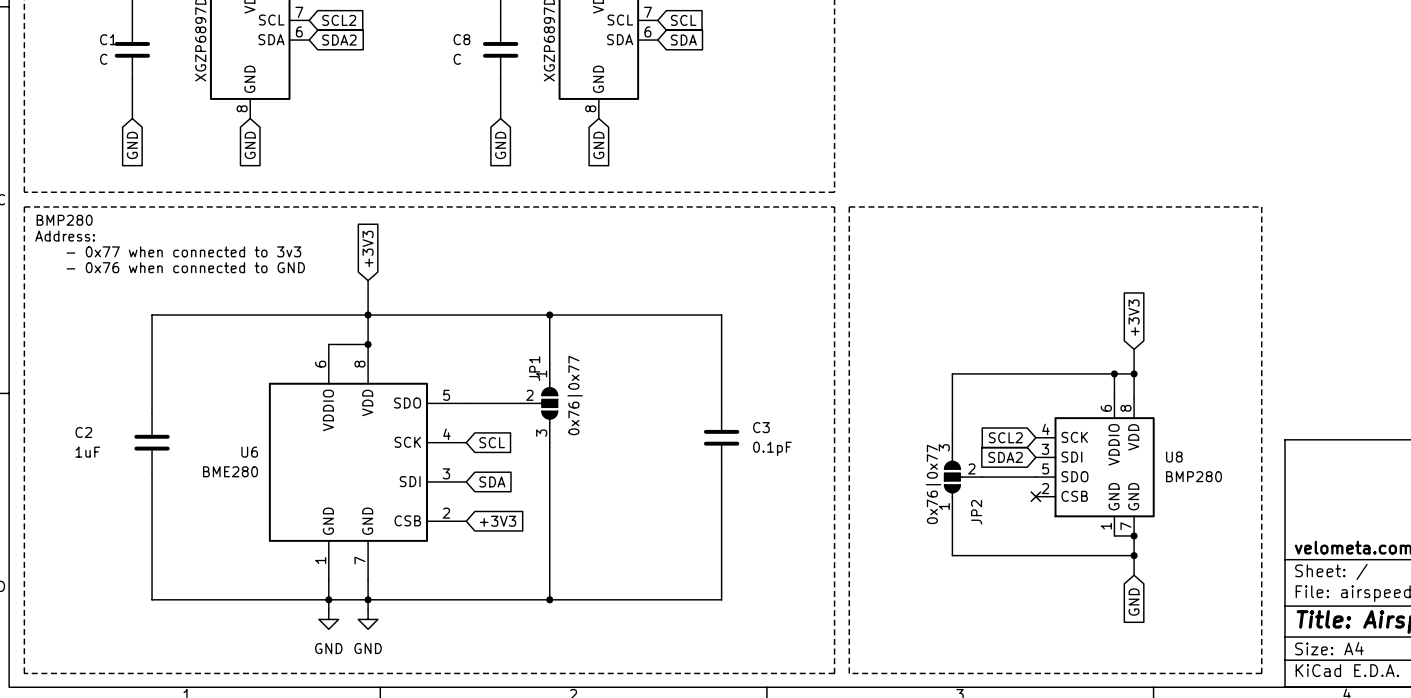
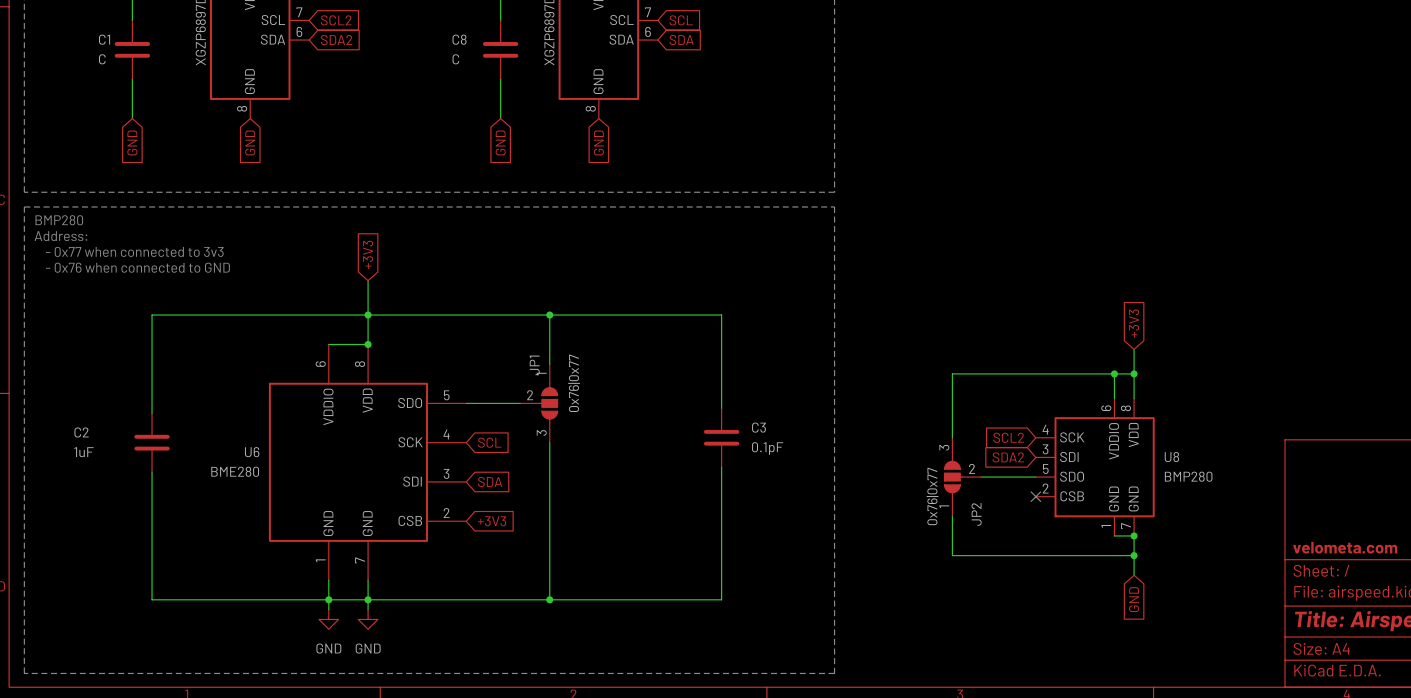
line: (849, 206) (1261, 206) (1261, 673) (849, 673) (849, 206) -> none

